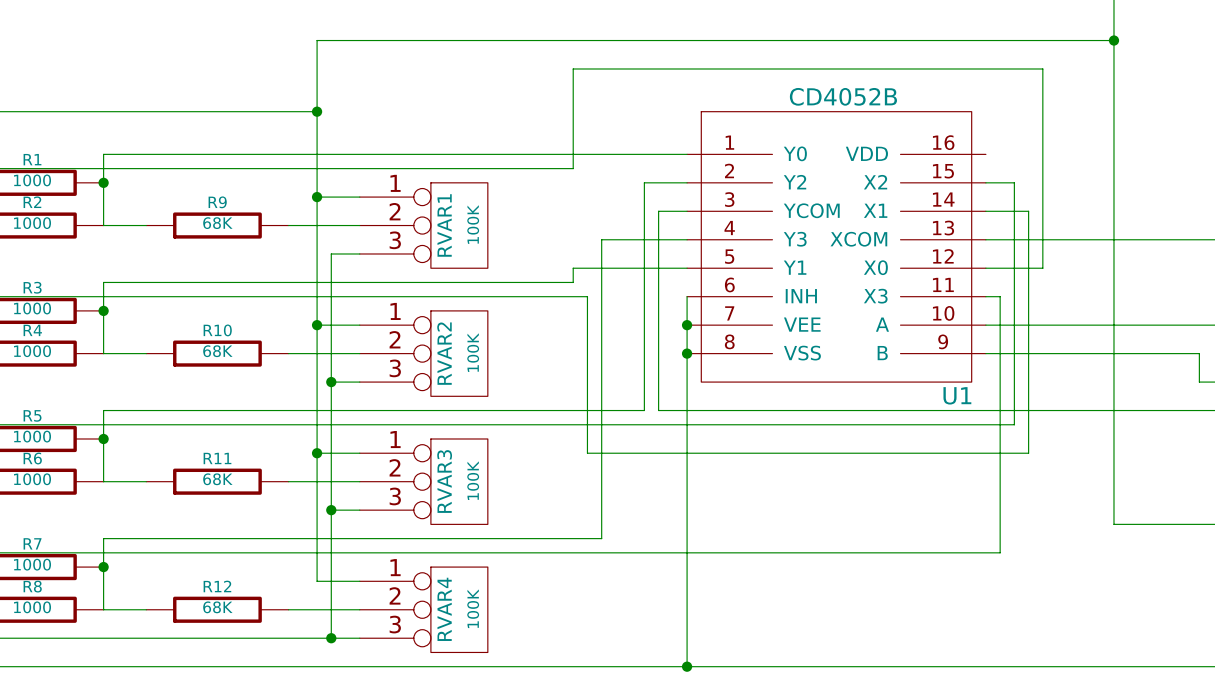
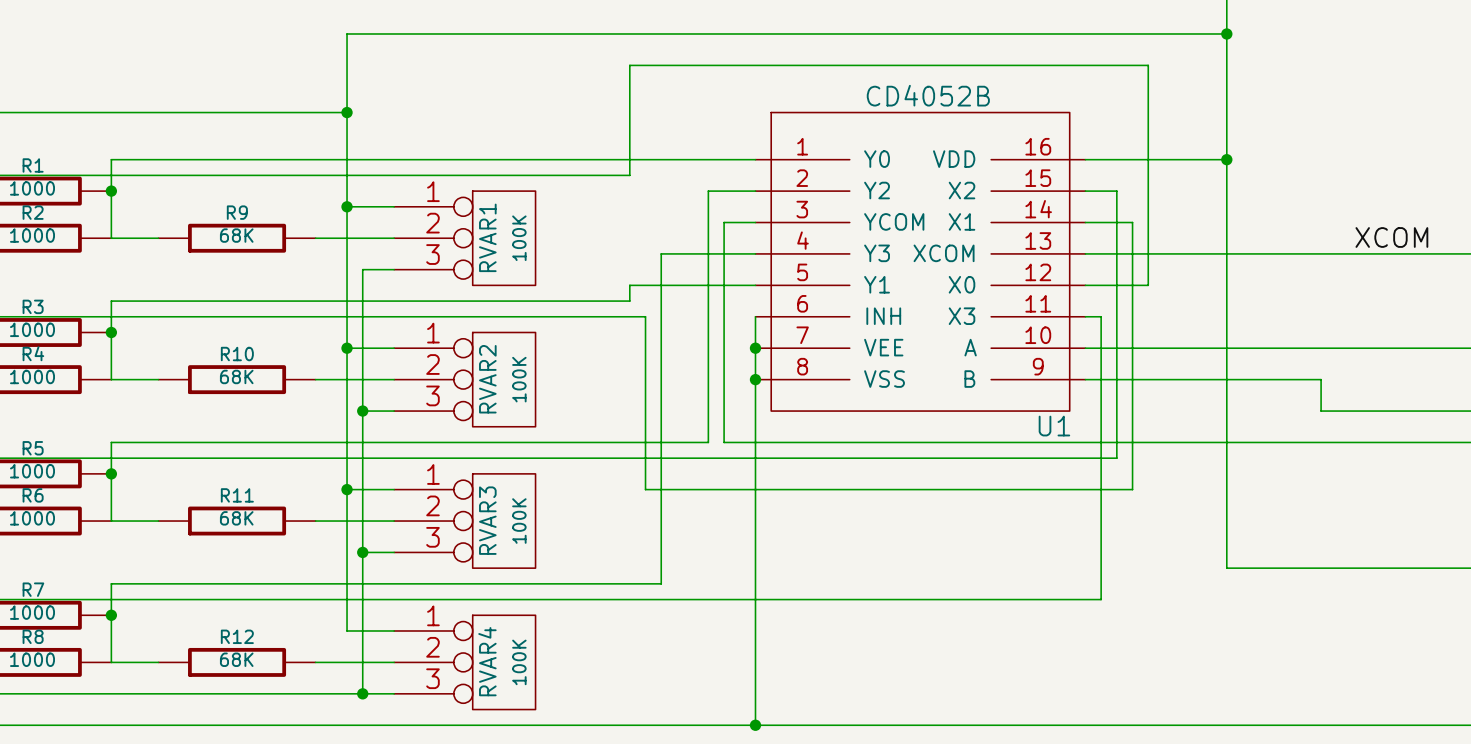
wire: none -> (1085, 159) (1226, 159)
junction: none -> (1226, 159)

